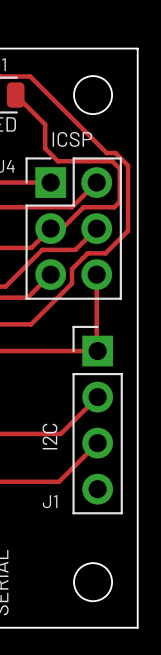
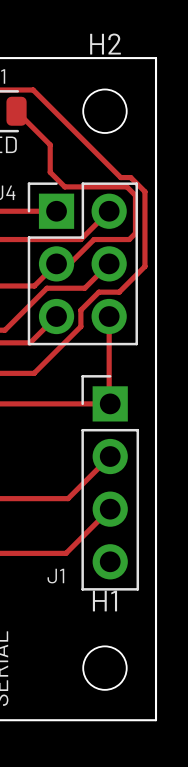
H2 name: none -> H2 (105, 44)
text: ICSP (72, 139) -> none
text: I2C (49, 436) -> none
H1 name: none -> H1 (104, 601)

